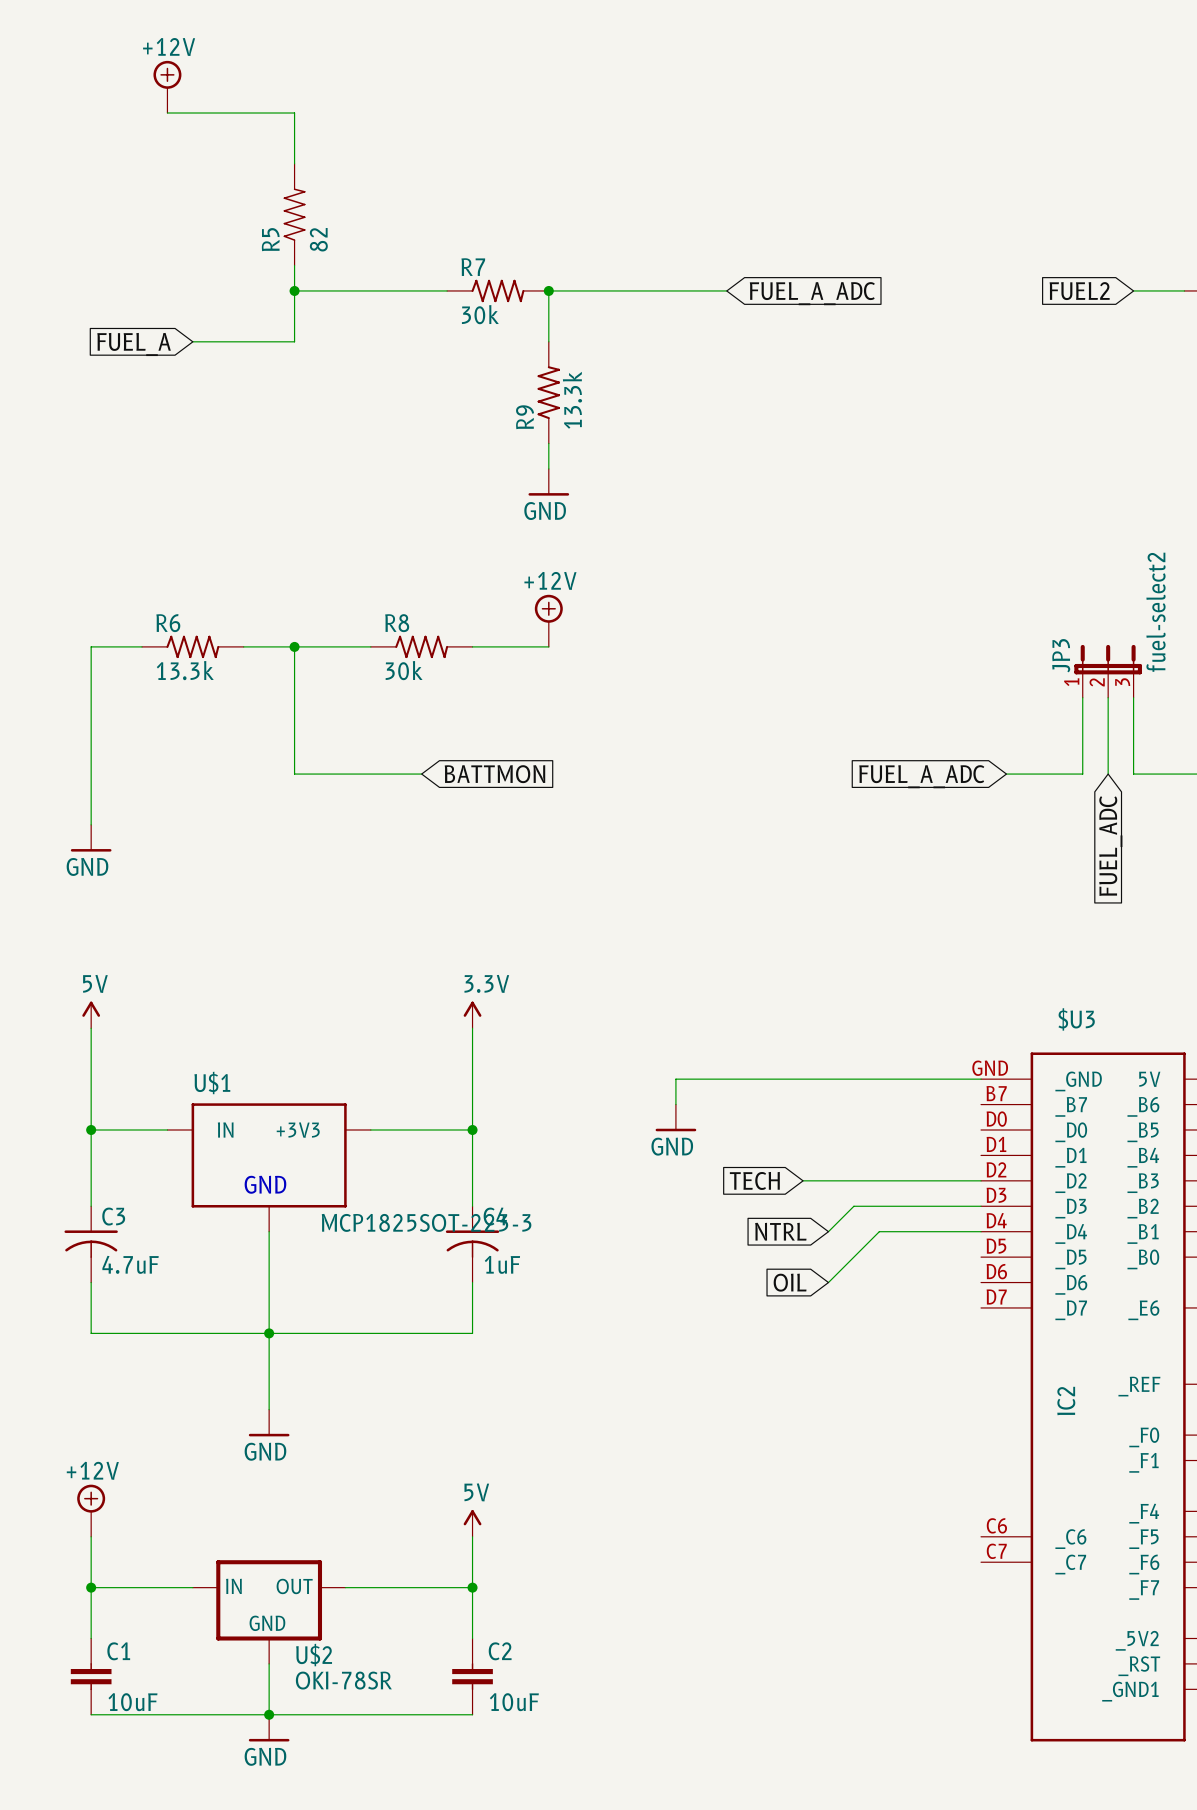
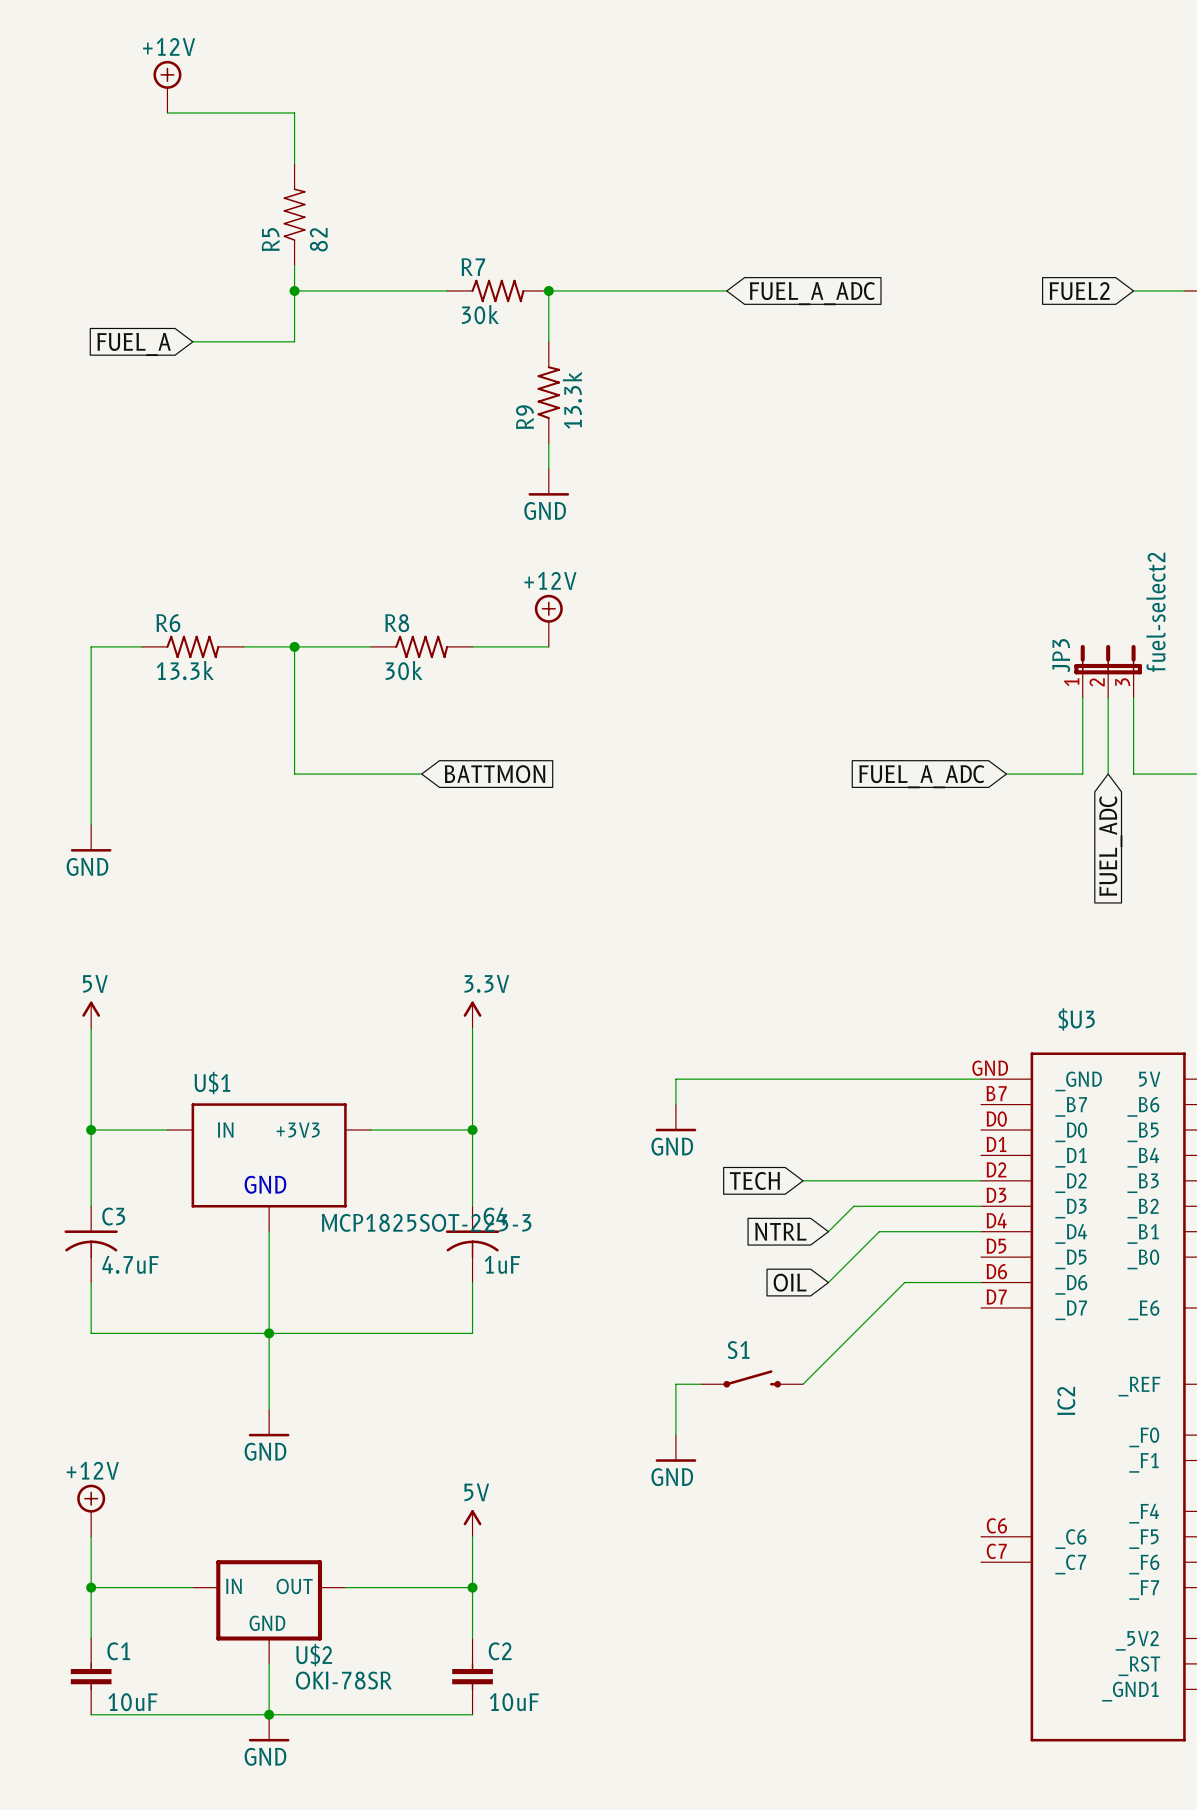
wire: none -> (981, 1282) (904, 1282) (803, 1384)
S1: none -> (752, 1378)
wire: none -> (701, 1384) (675, 1384) (675, 1435)
power symbol: none -> GND (675, 1448)

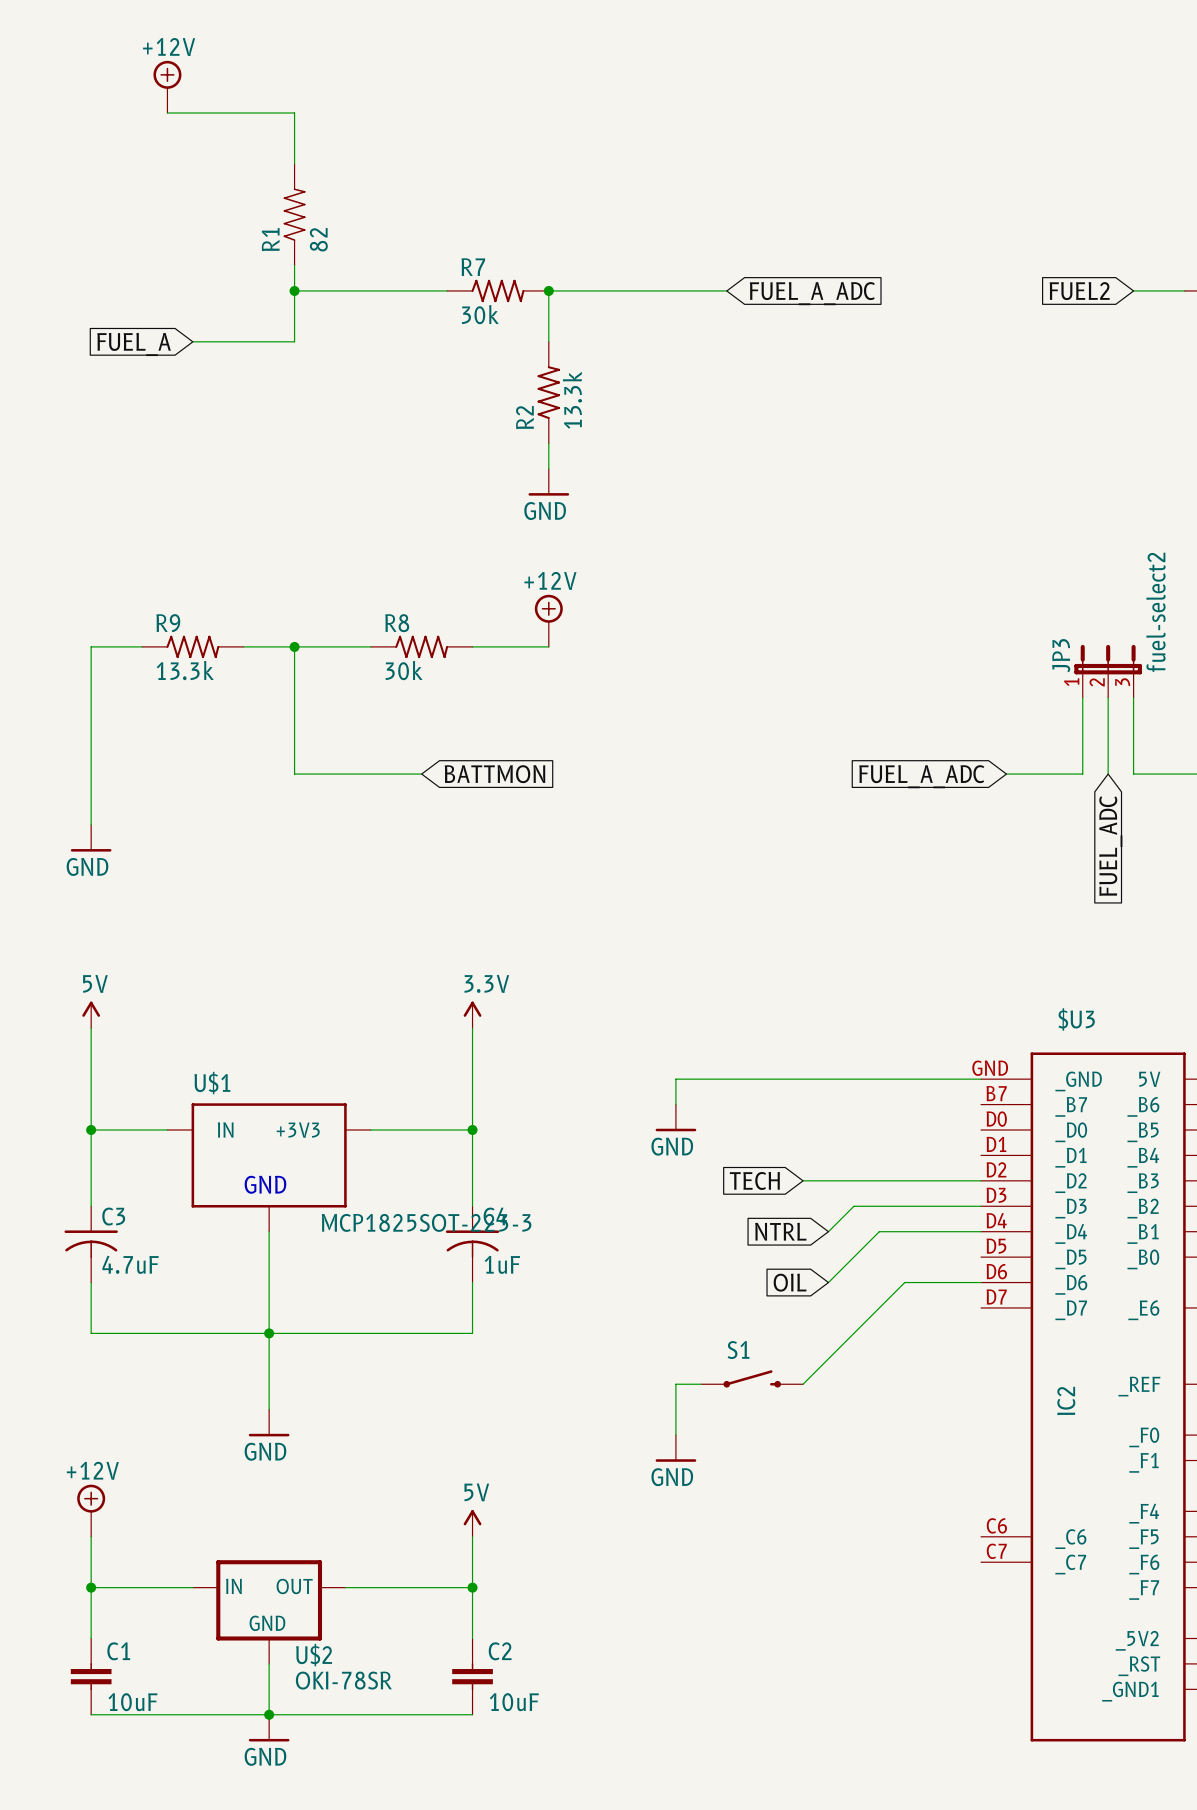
R5 name: R5 (270, 239) -> R1 (270, 239)
R9 name: R9 (525, 417) -> R2 (524, 417)
R6 name: R6 (168, 623) -> R9 (168, 623)

